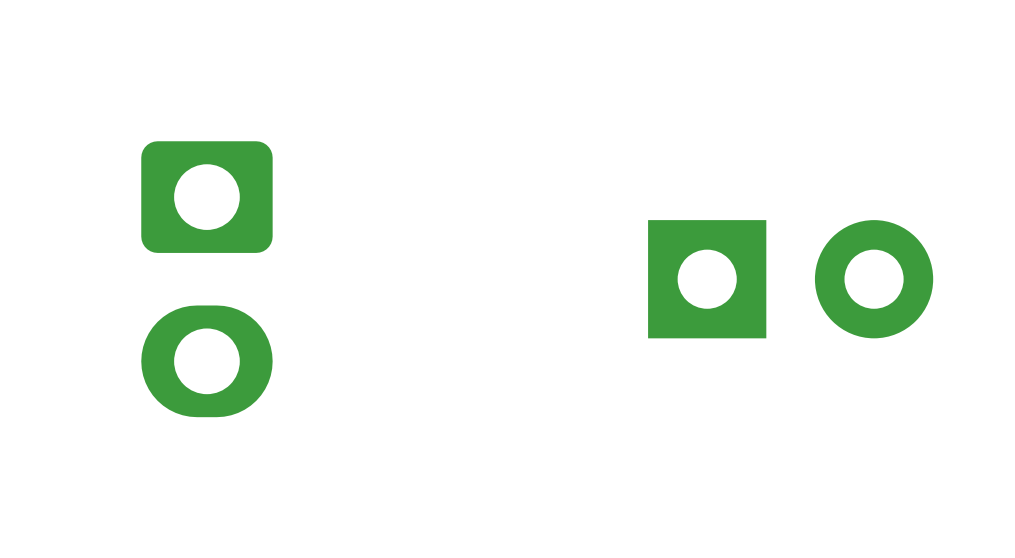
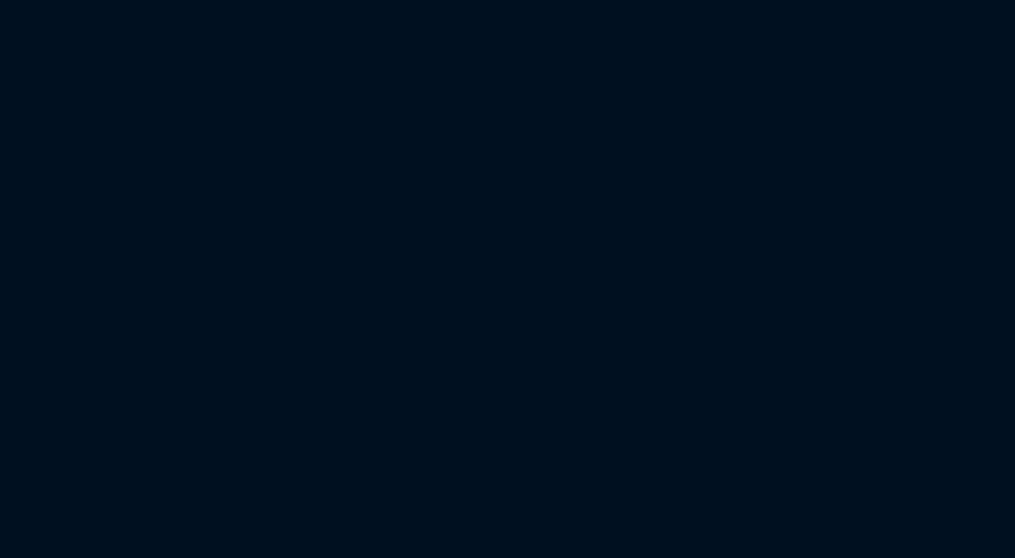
part: (206, 279) -> none
part: (790, 279) -> none

